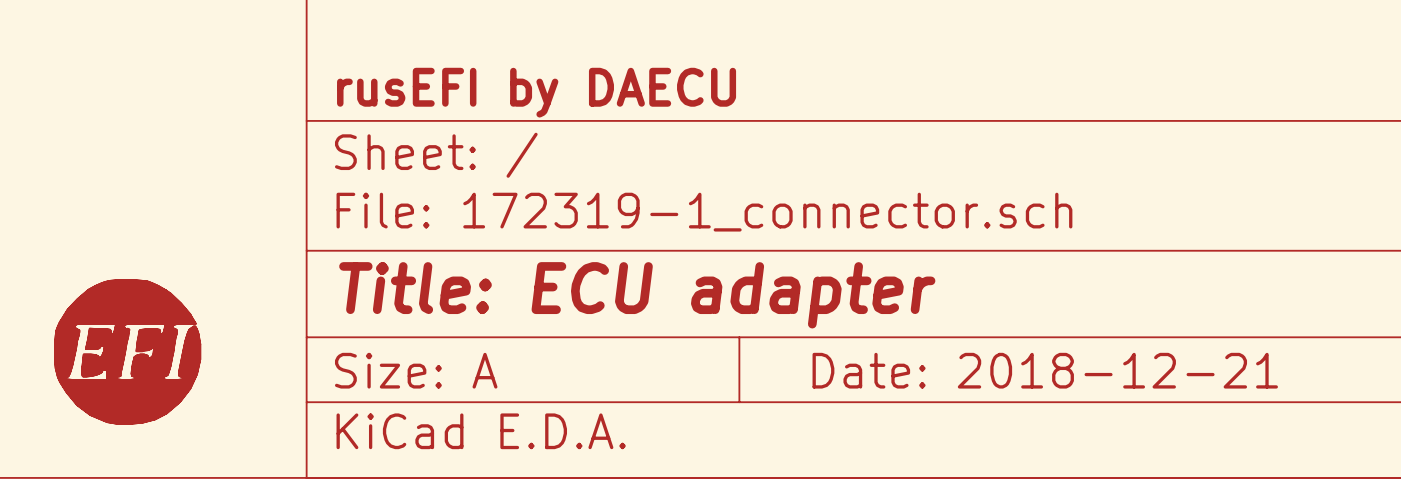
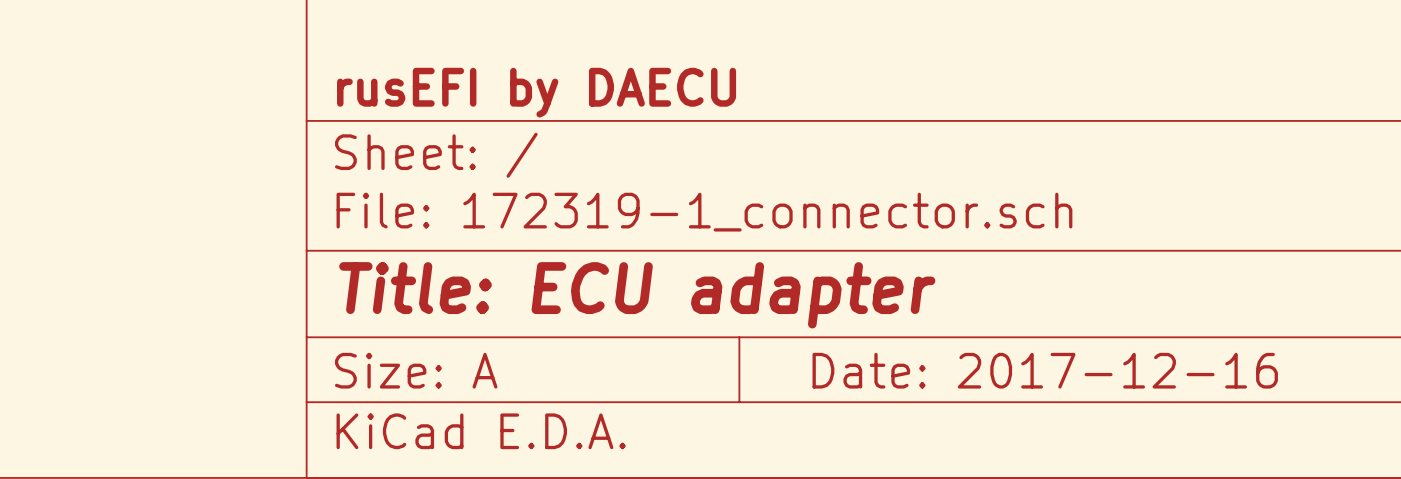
power symbol: (127, 352) -> none
title block: Date: 2018-12-21 (1045, 370) -> Date: 2017-12-16 (1045, 370)

